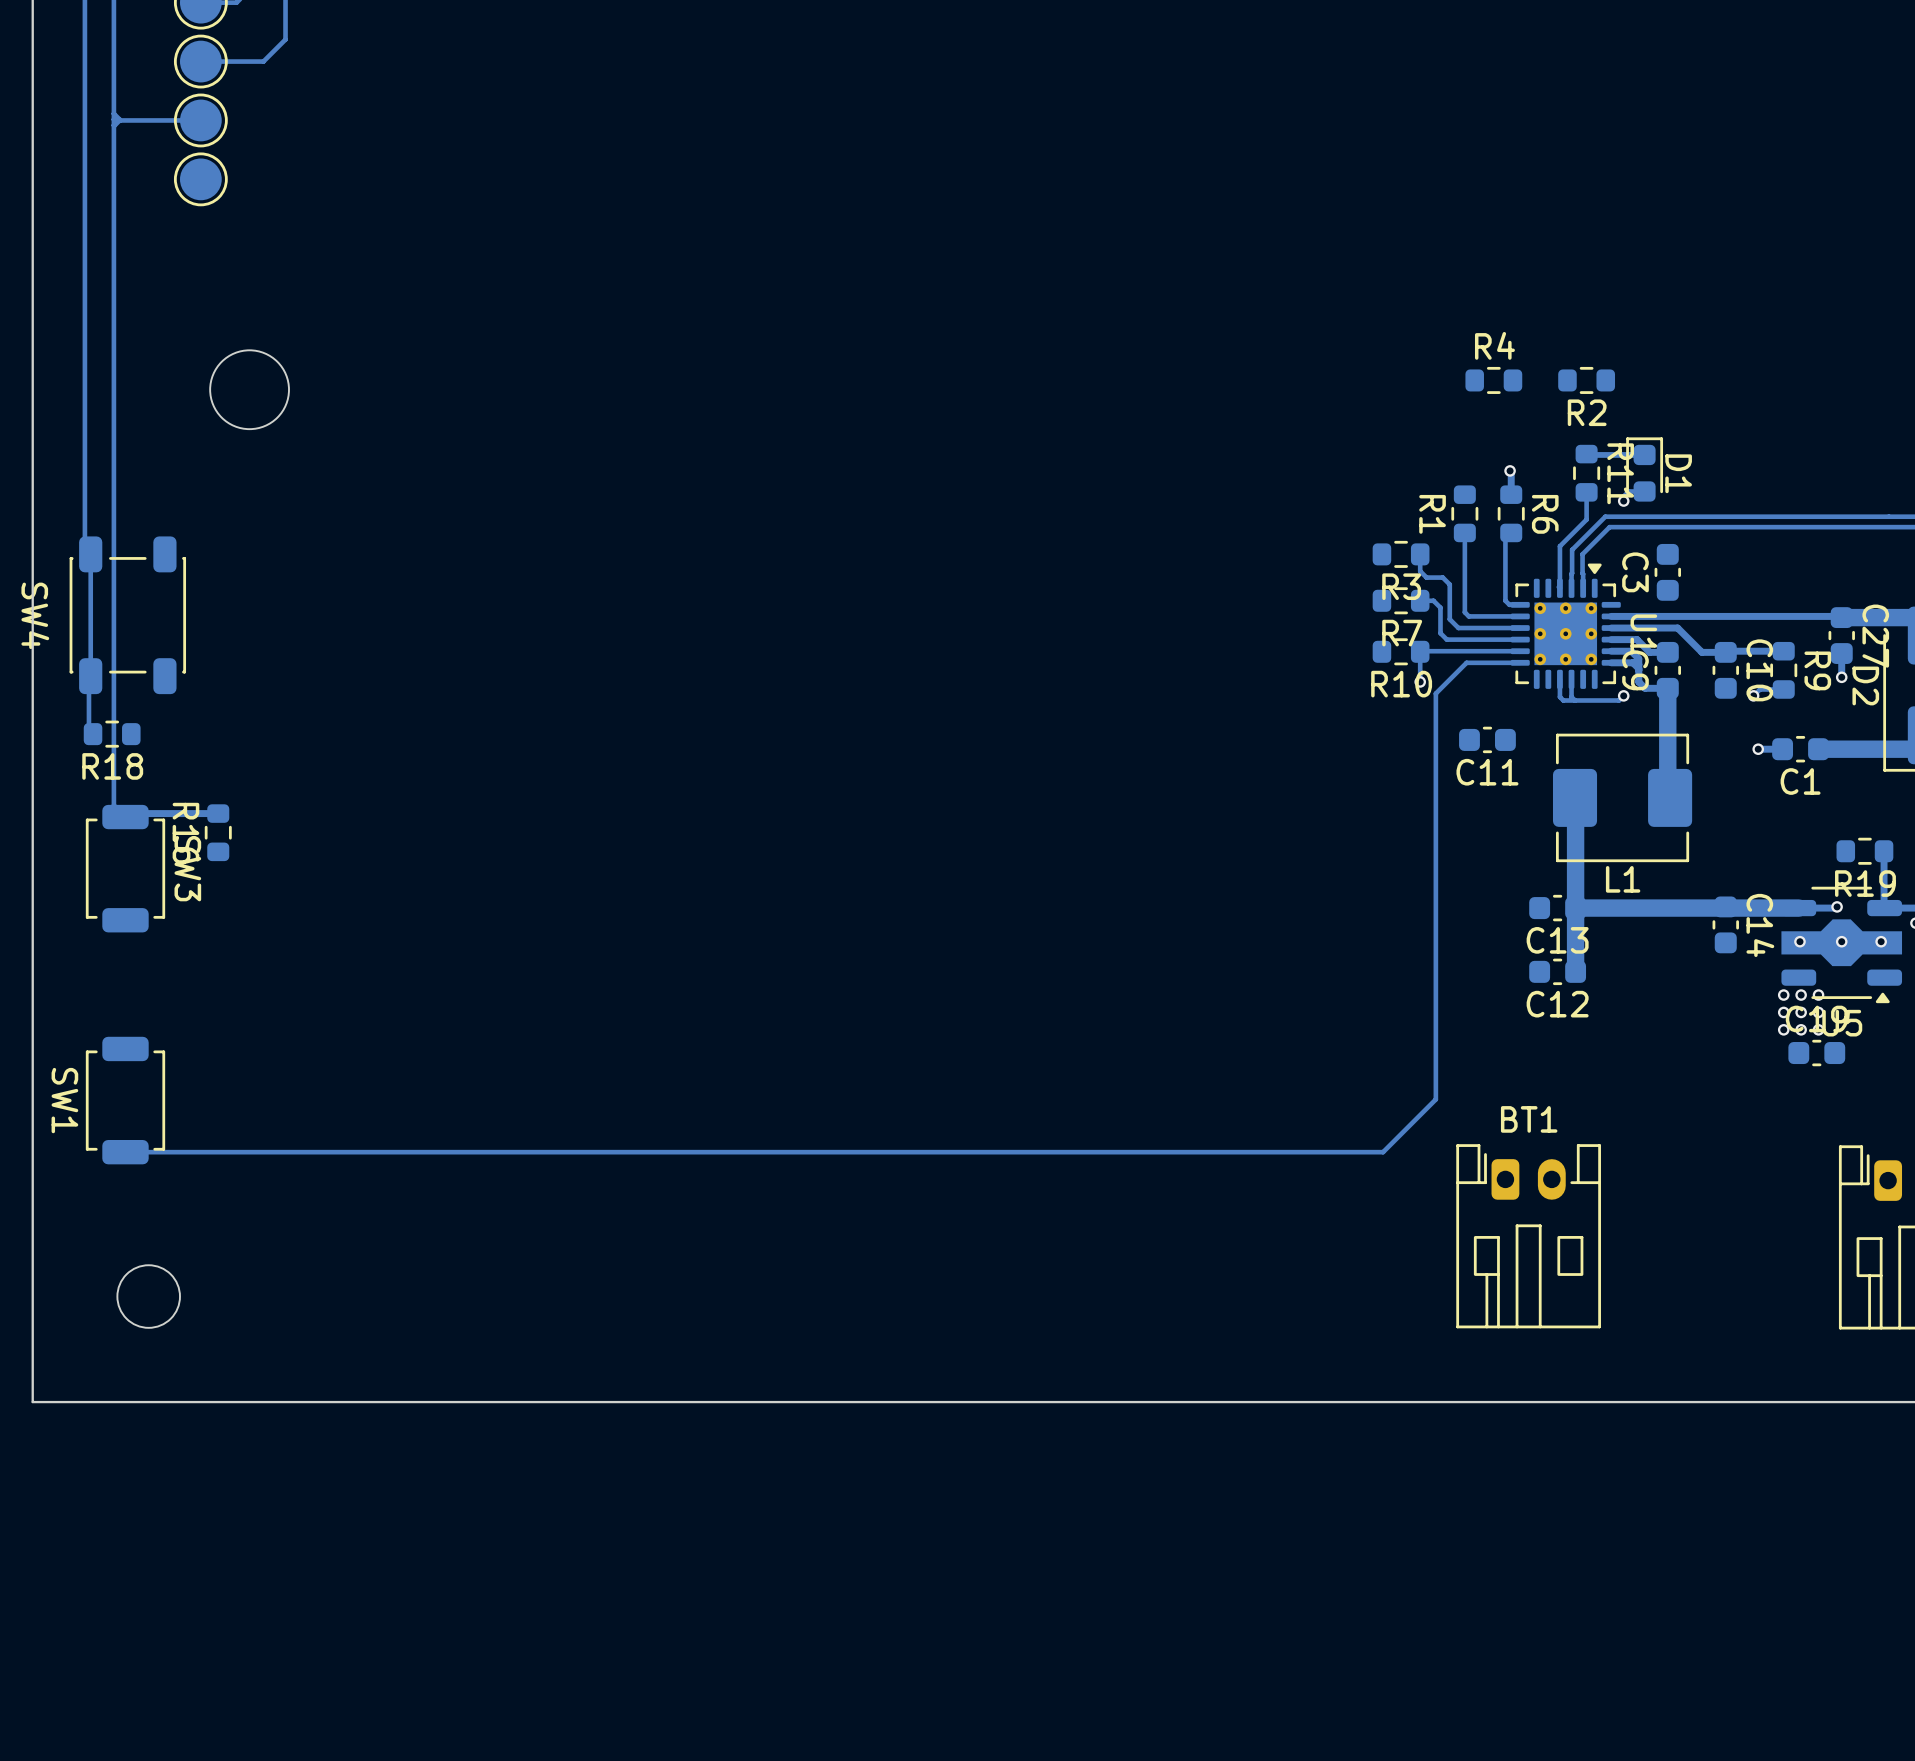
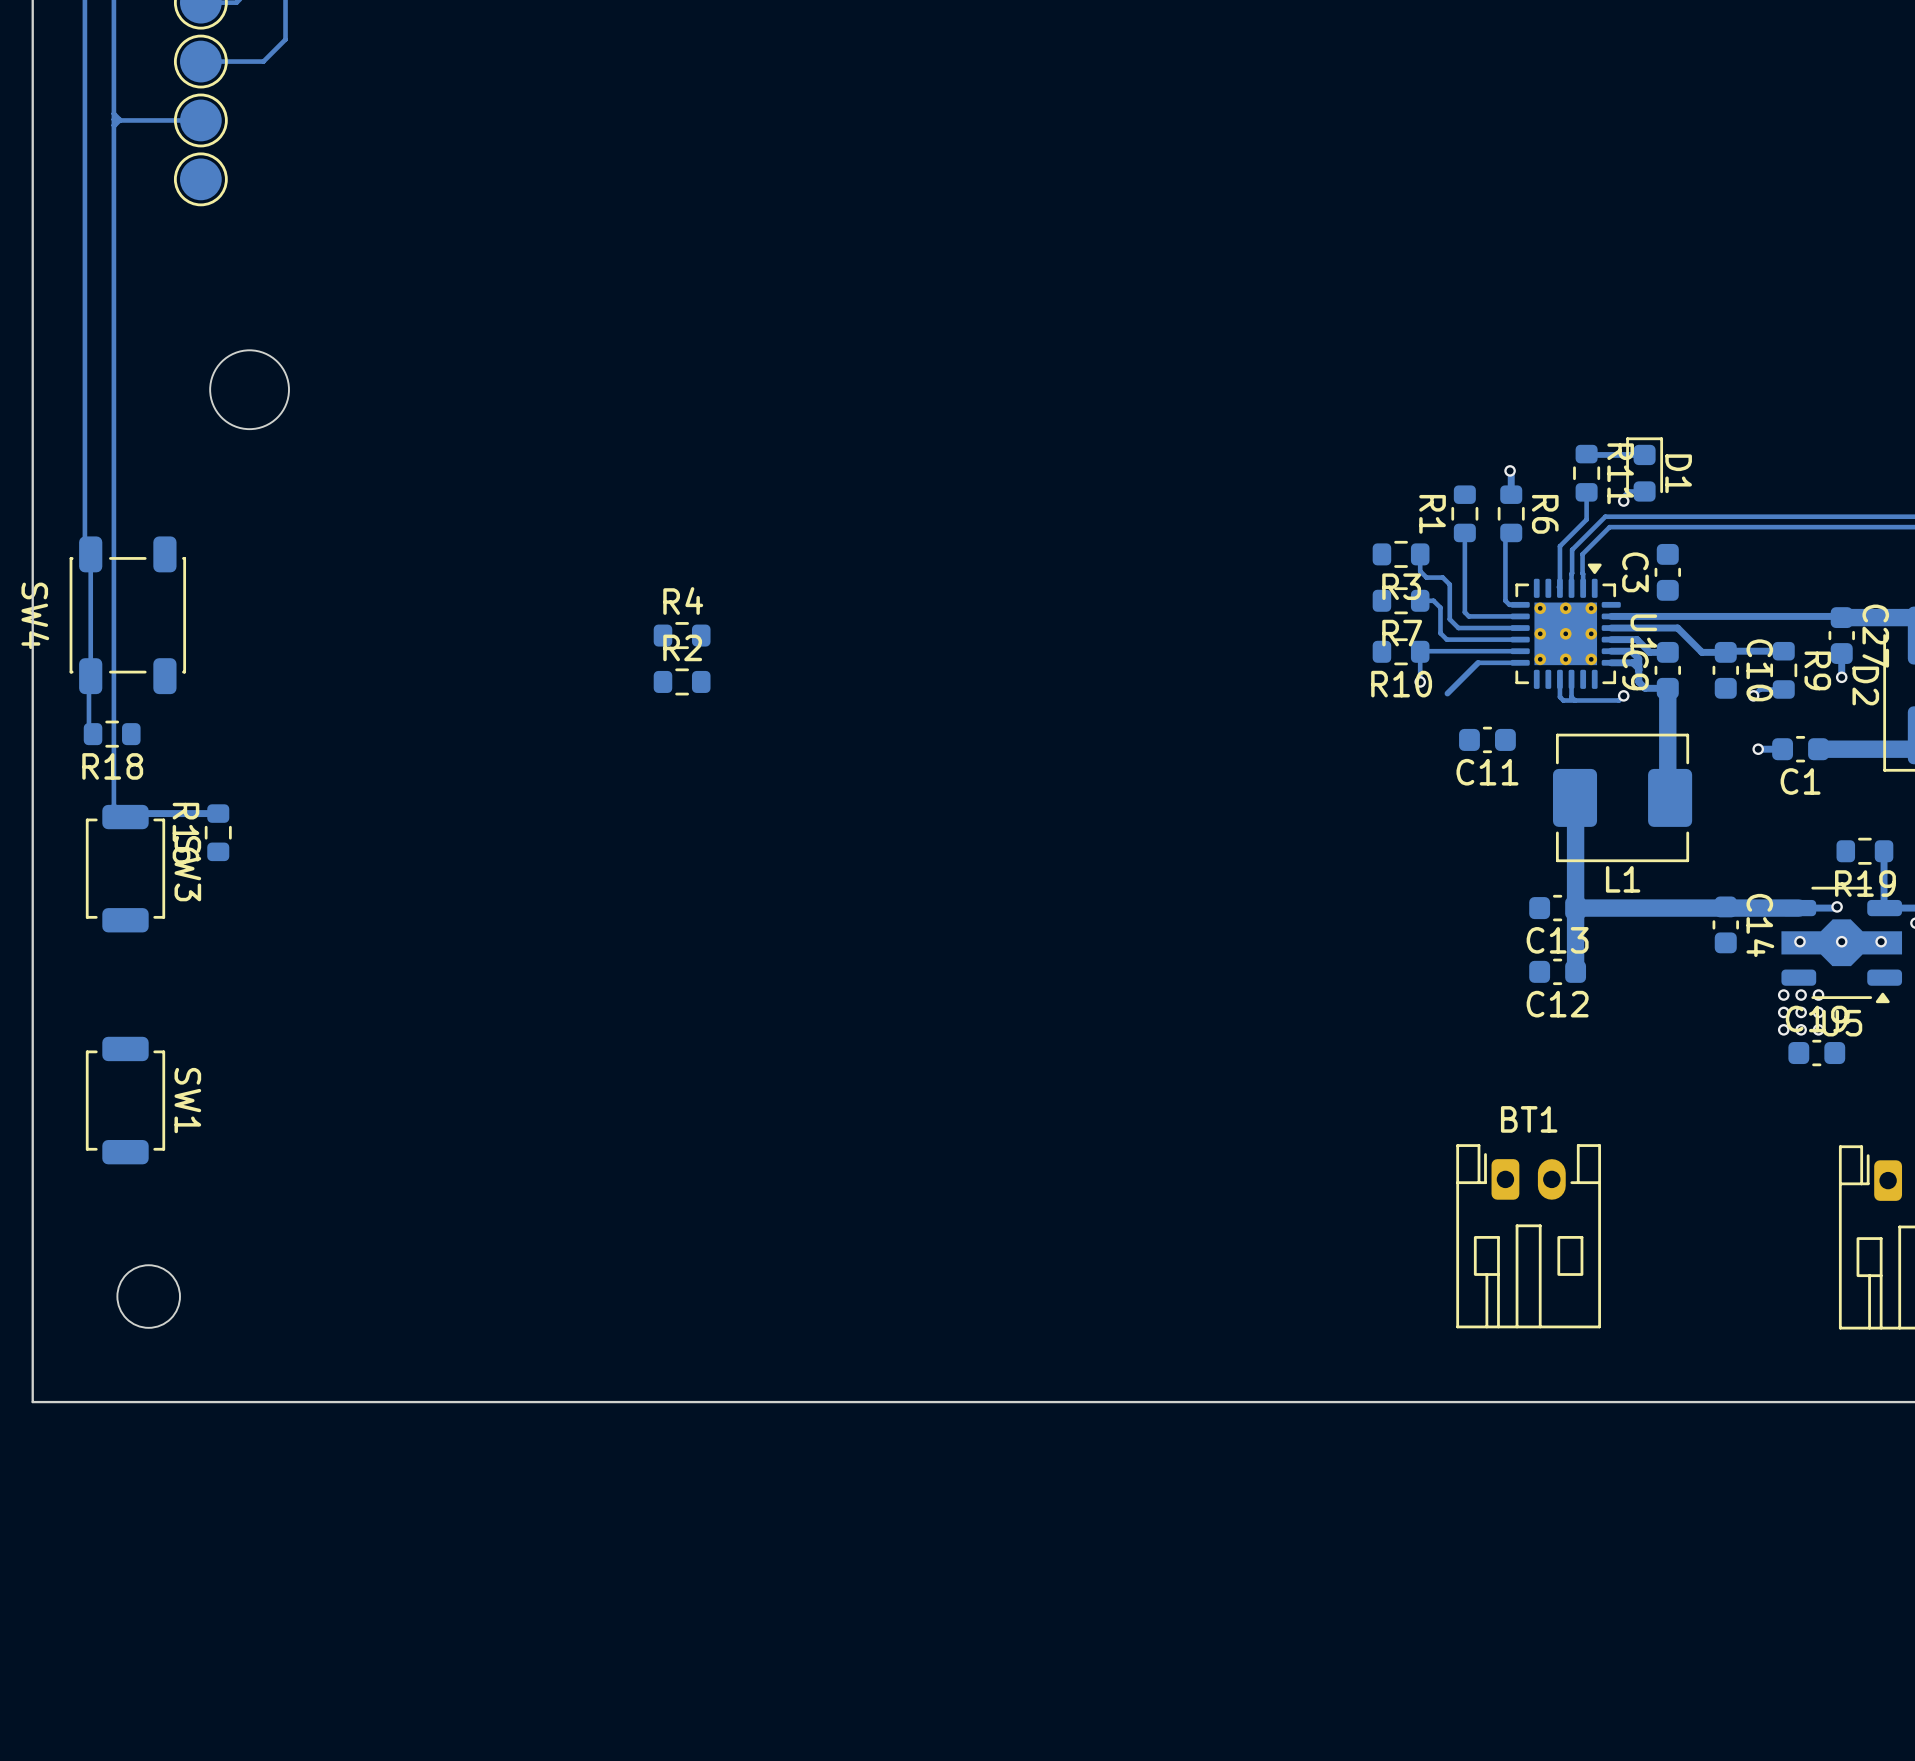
R4 position: (1493, 380) -> (682, 635)
R2 position: (1586, 380) -> (682, 681)
R2 name position: R2 (1587, 412) -> R2 (682, 647)
track: (1478, 662) (1466, 662) (1435, 693) (1435, 1099) (1383, 1152) (125, 1152) -> (1478, 662) (1447, 693)
SW1 name position: SW1 (64, 1100) -> SW1 (187, 1100)

